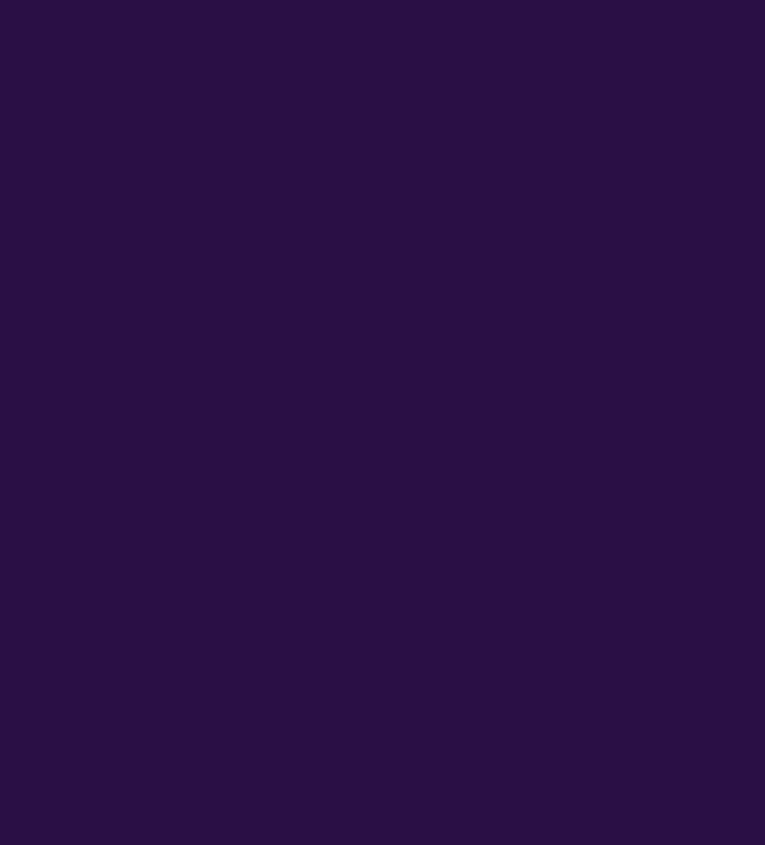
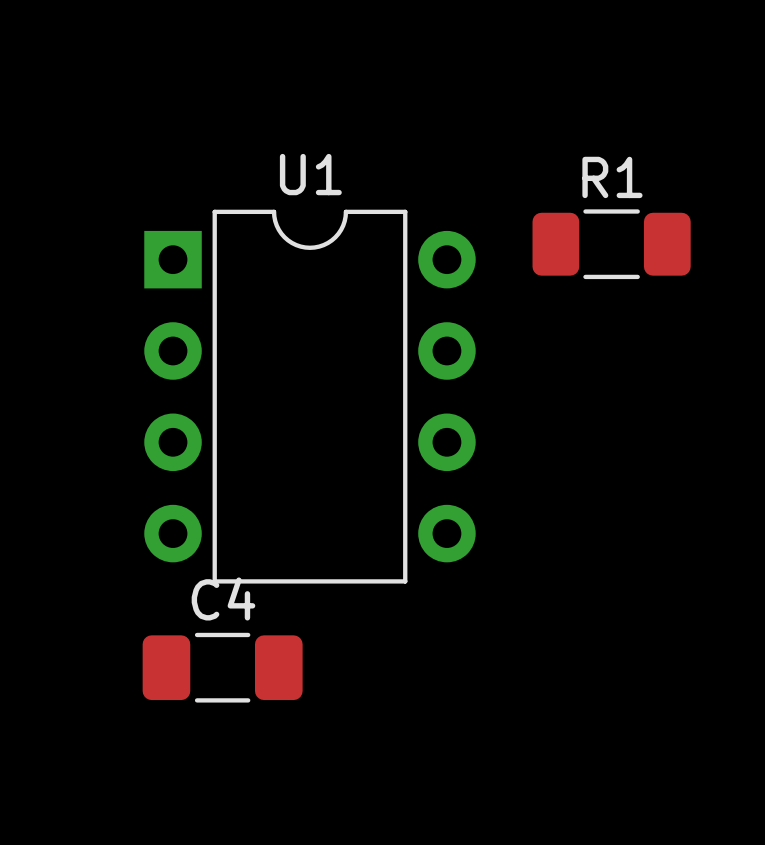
R1: none -> (611, 244)
U1: none -> (309, 396)
C4: none -> (222, 667)

